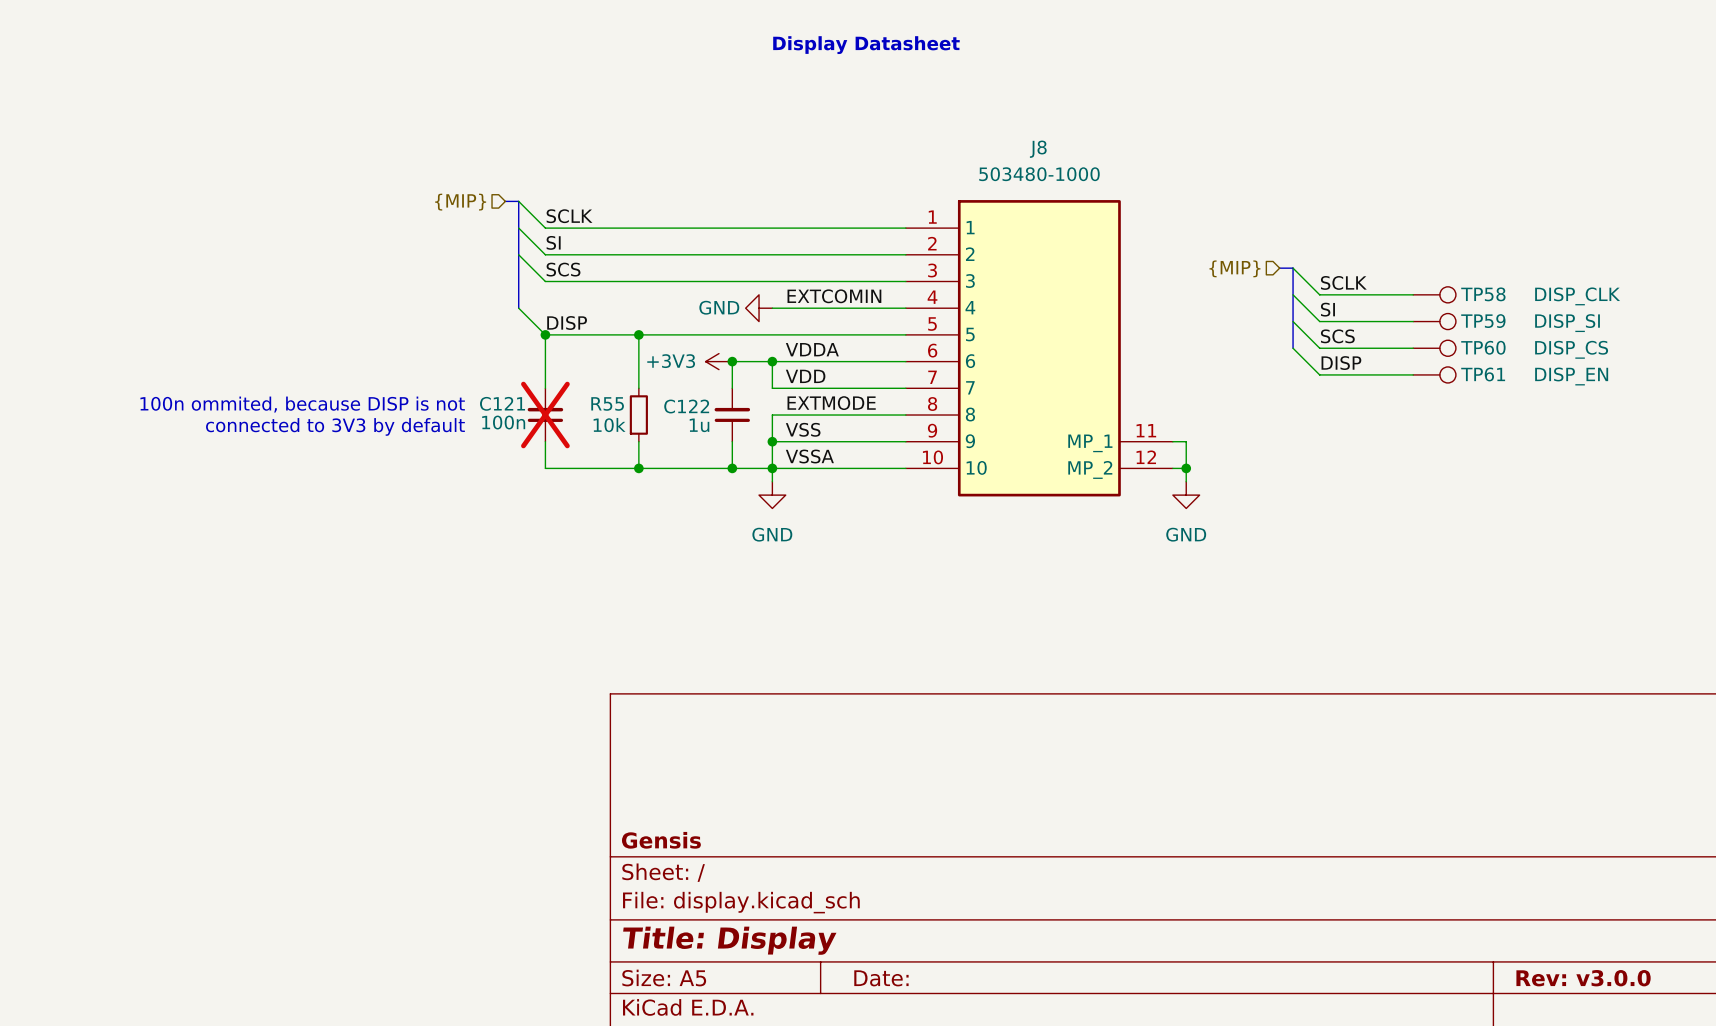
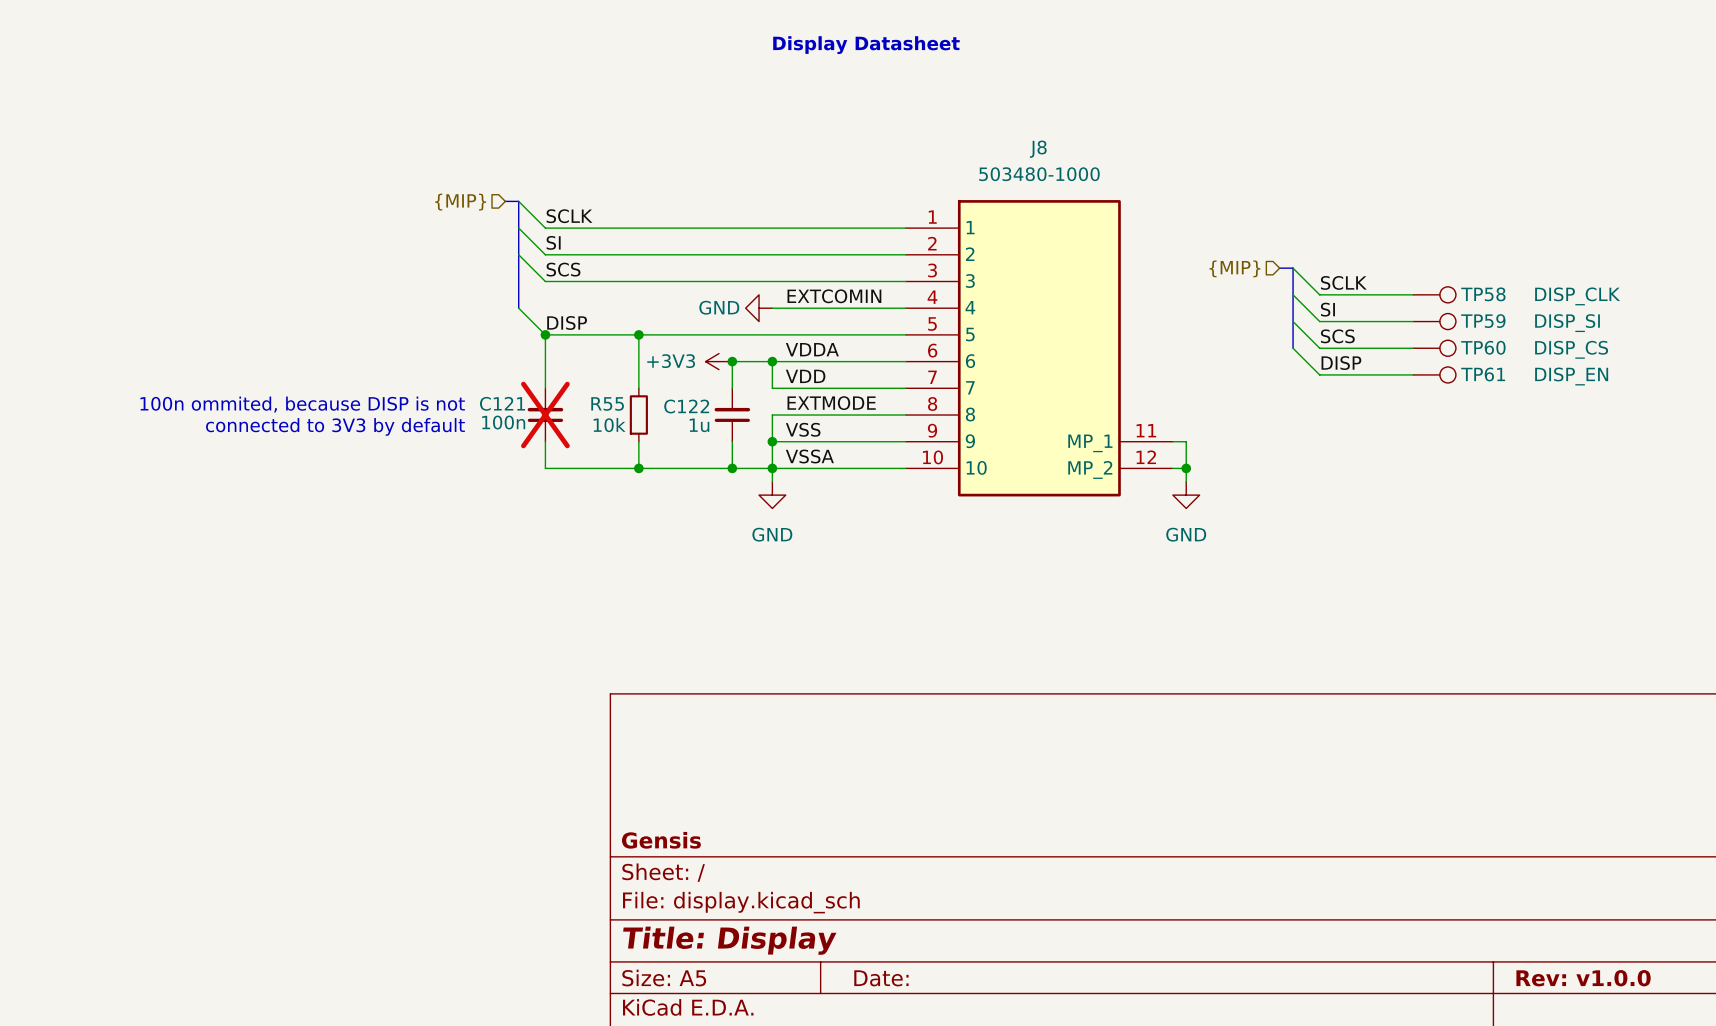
title block: Rev: v3.0.0 (1583, 978) -> Rev: v1.0.0 (1583, 978)

